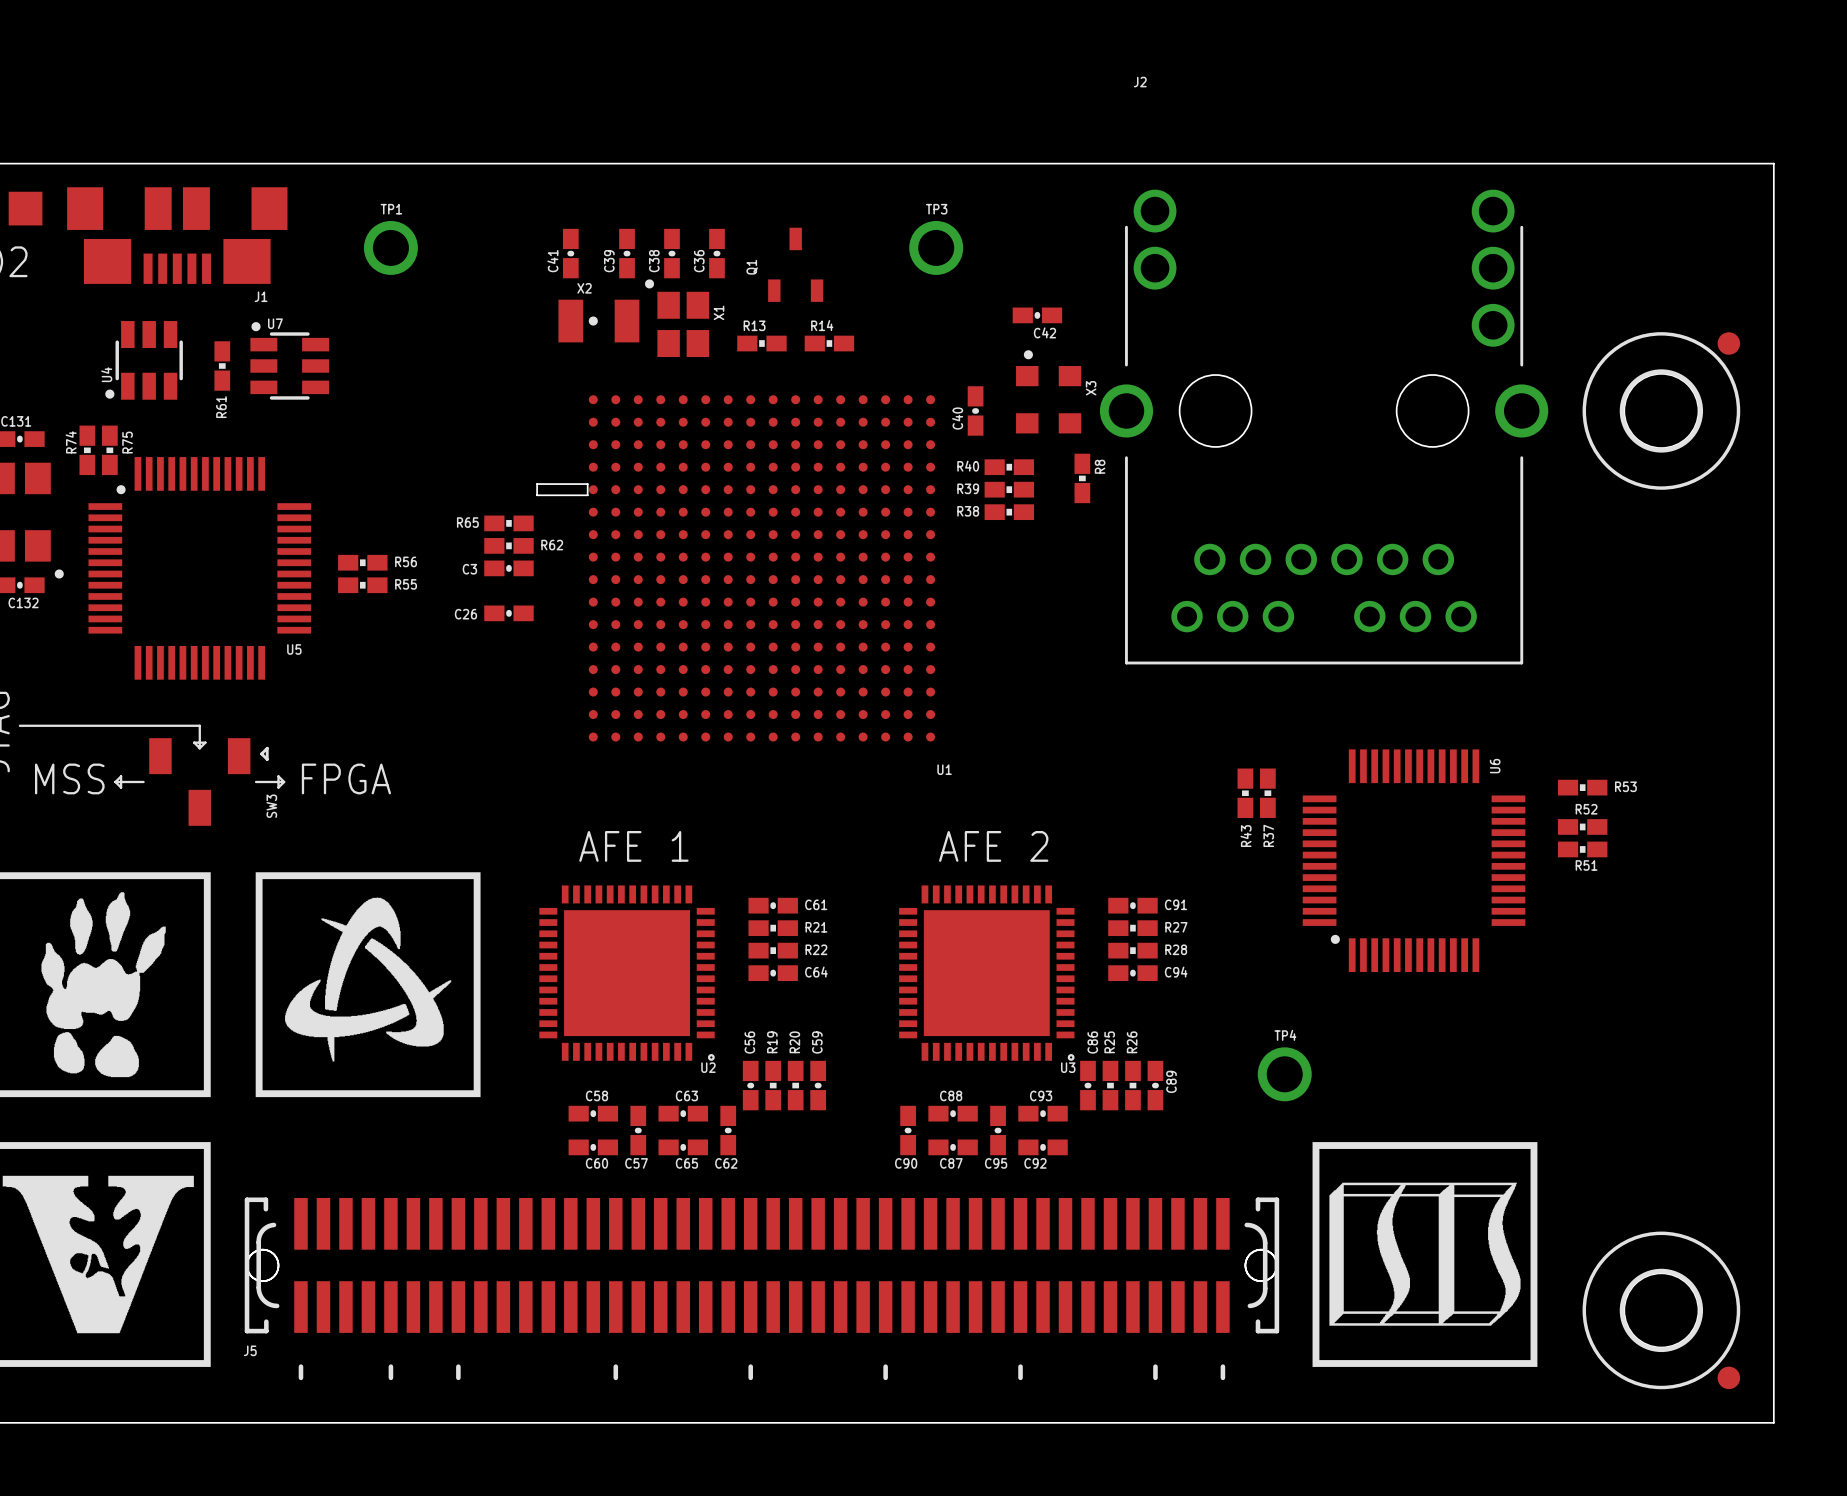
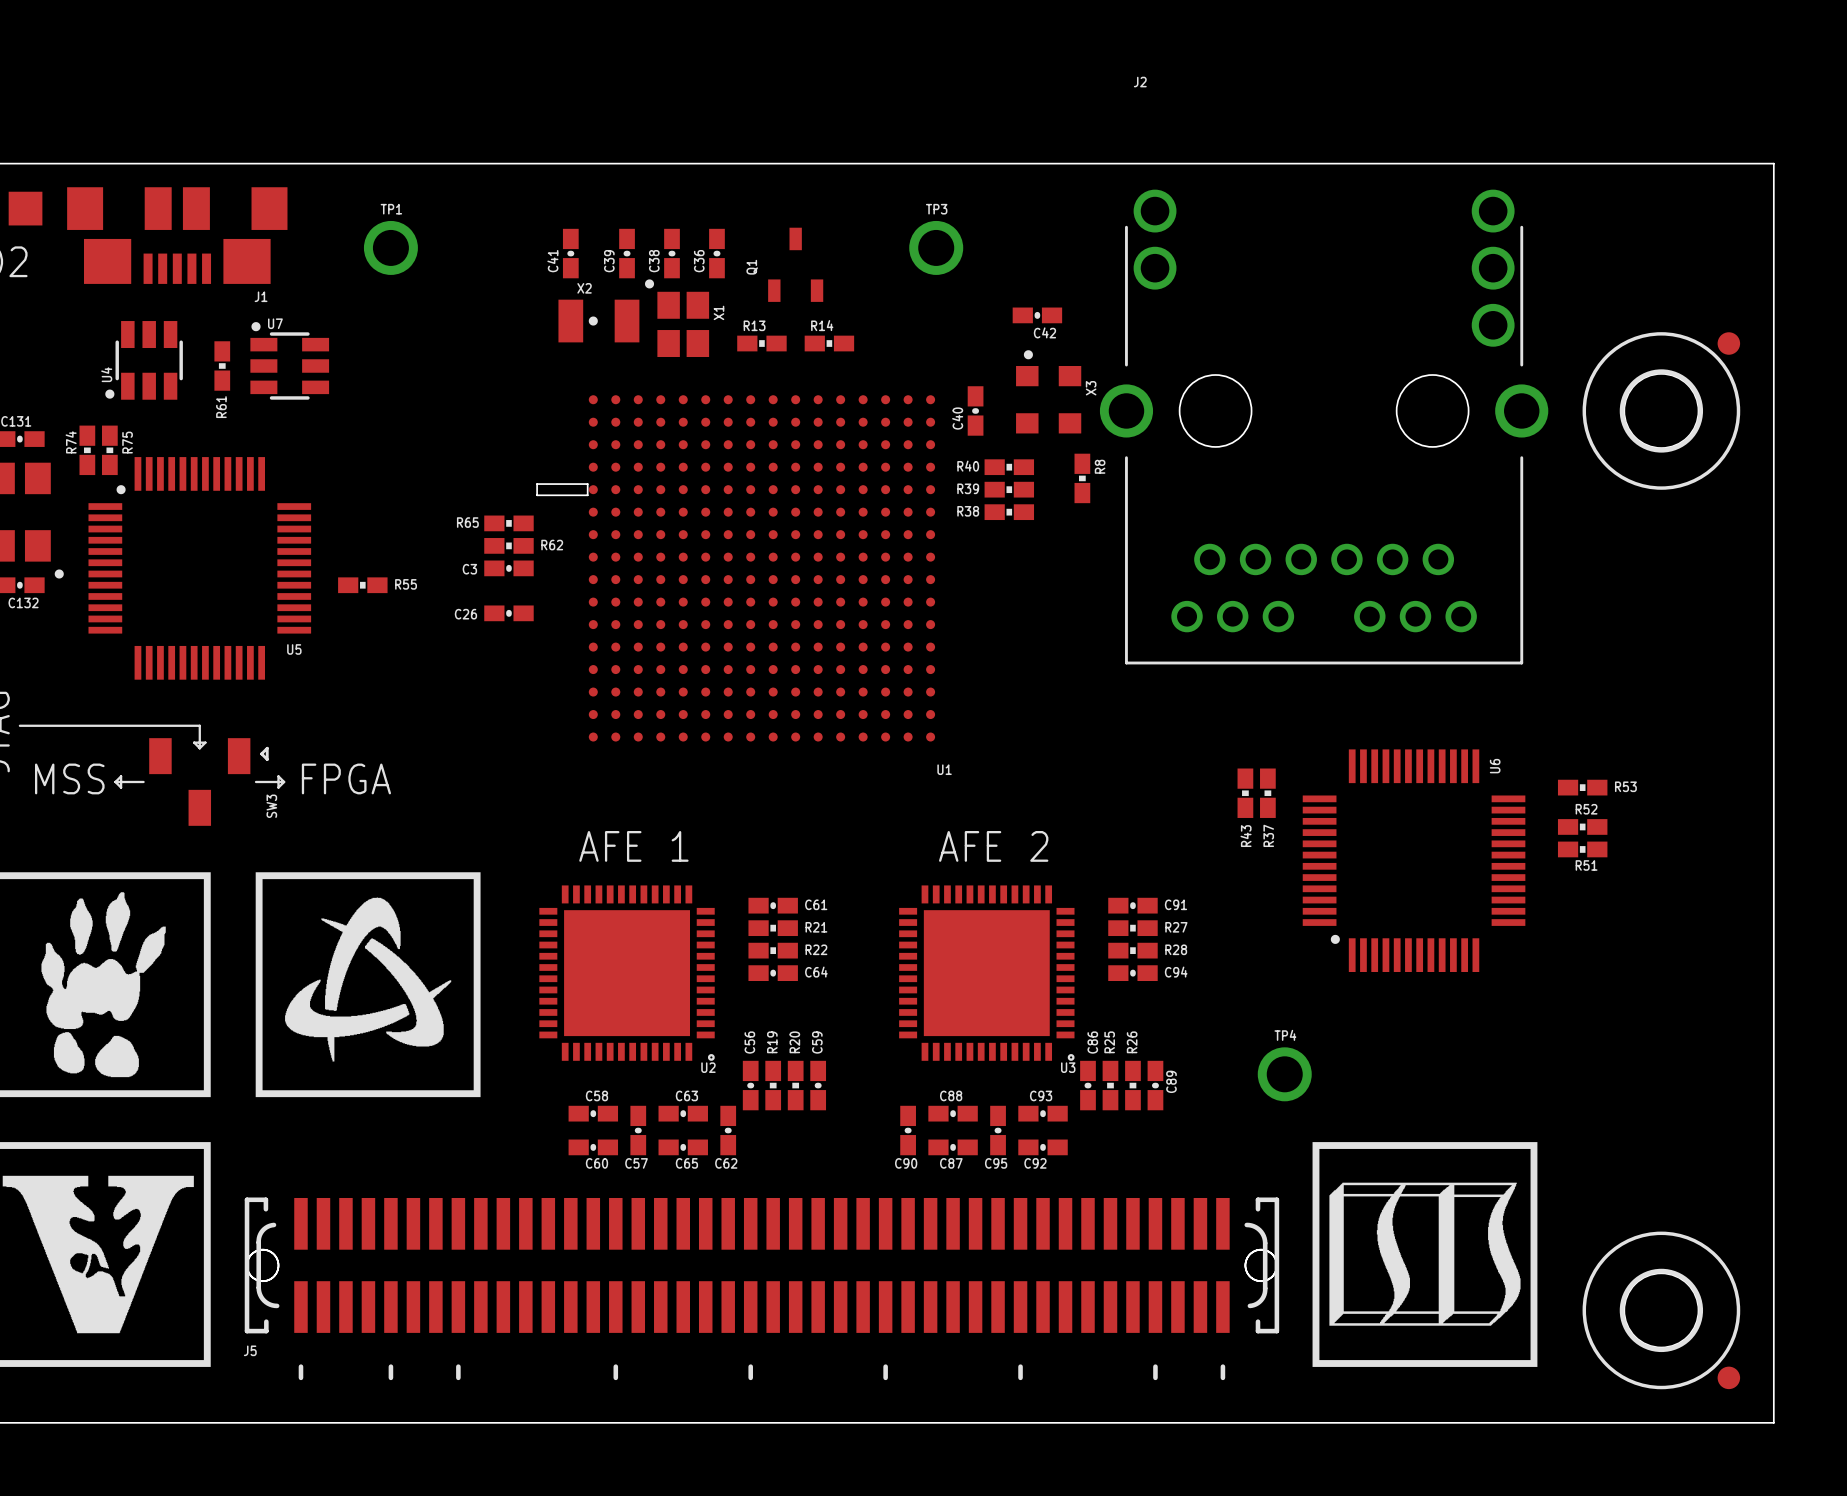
R56: (362, 562) -> none

